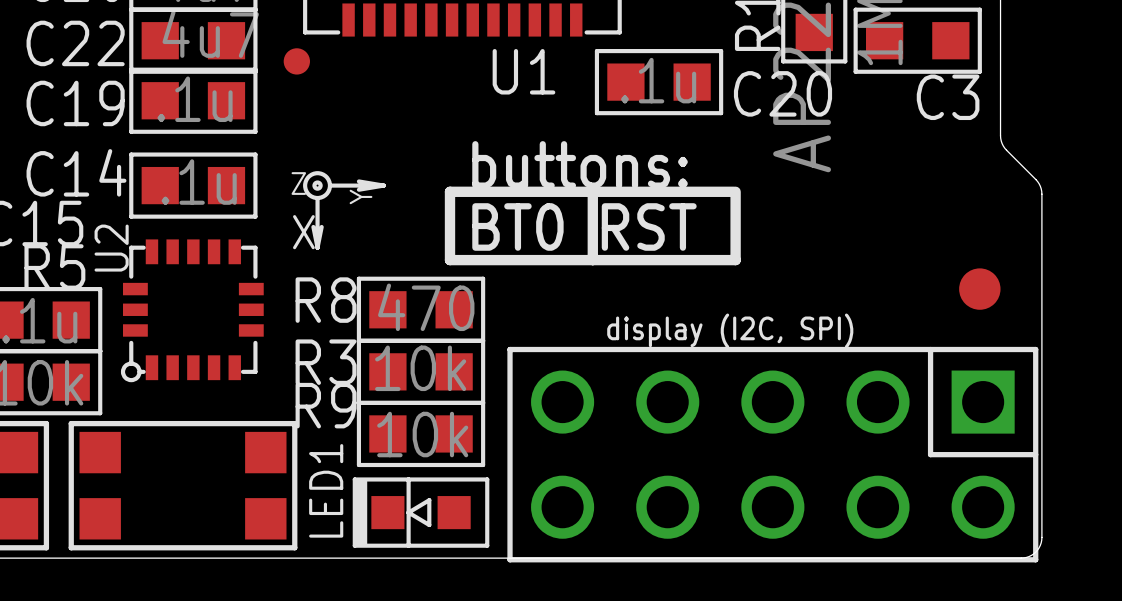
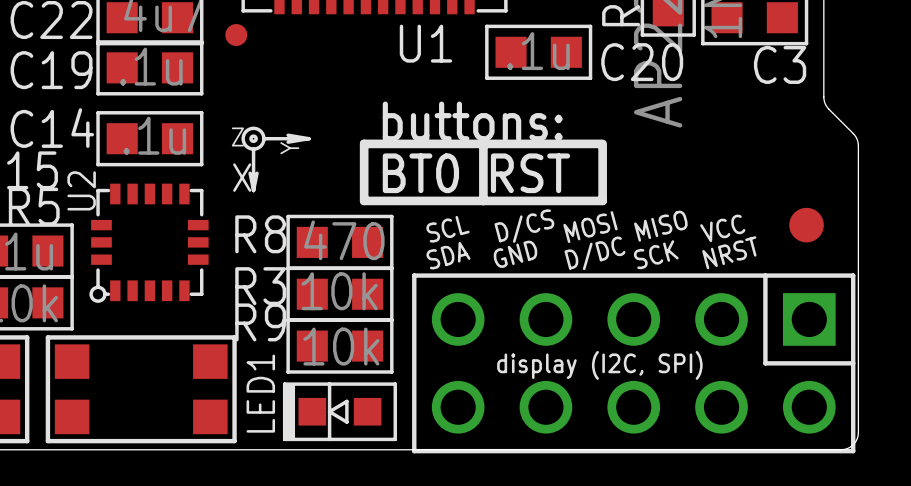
text: none -> D/CS (524, 226)
text: none -> MISO (660, 226)
text: none -> MOSI (590, 227)
text: none -> VCC (722, 228)
text: none -> SCL (447, 229)
text: none -> D/DC (594, 253)
text: none -> NRST (729, 252)
text: none -> SCK (656, 254)
text: none -> SDA (448, 255)
text: display (I2C, SPI) (730, 330) -> GND (515, 254)
text: none -> display (I2C, SPI) (599, 365)

